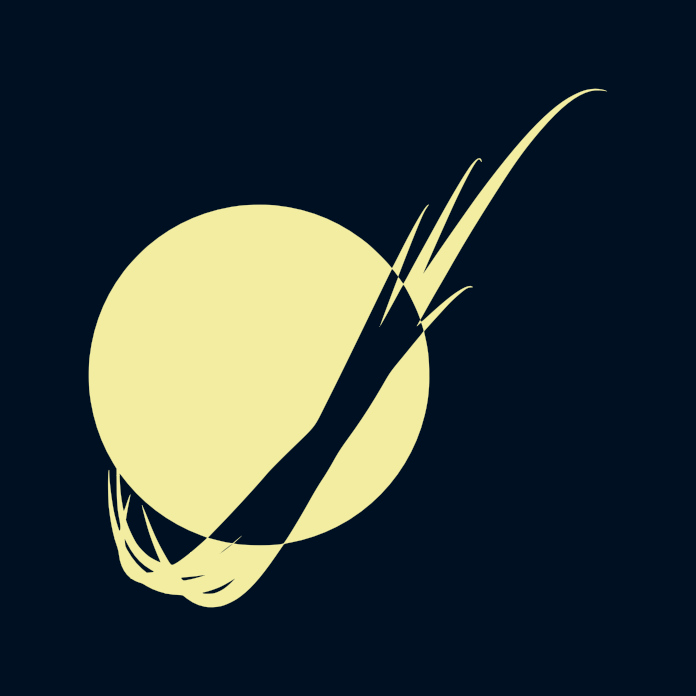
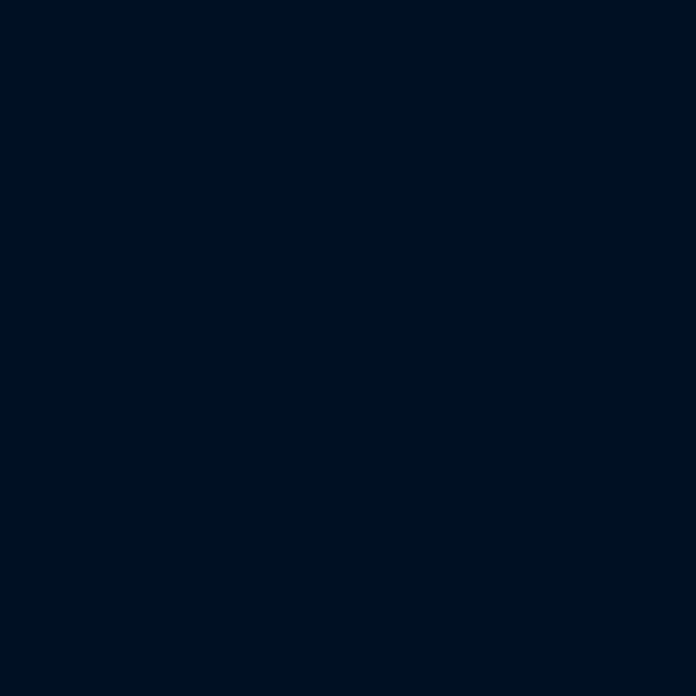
drawing: [88, 88, 608, 608] -> none

